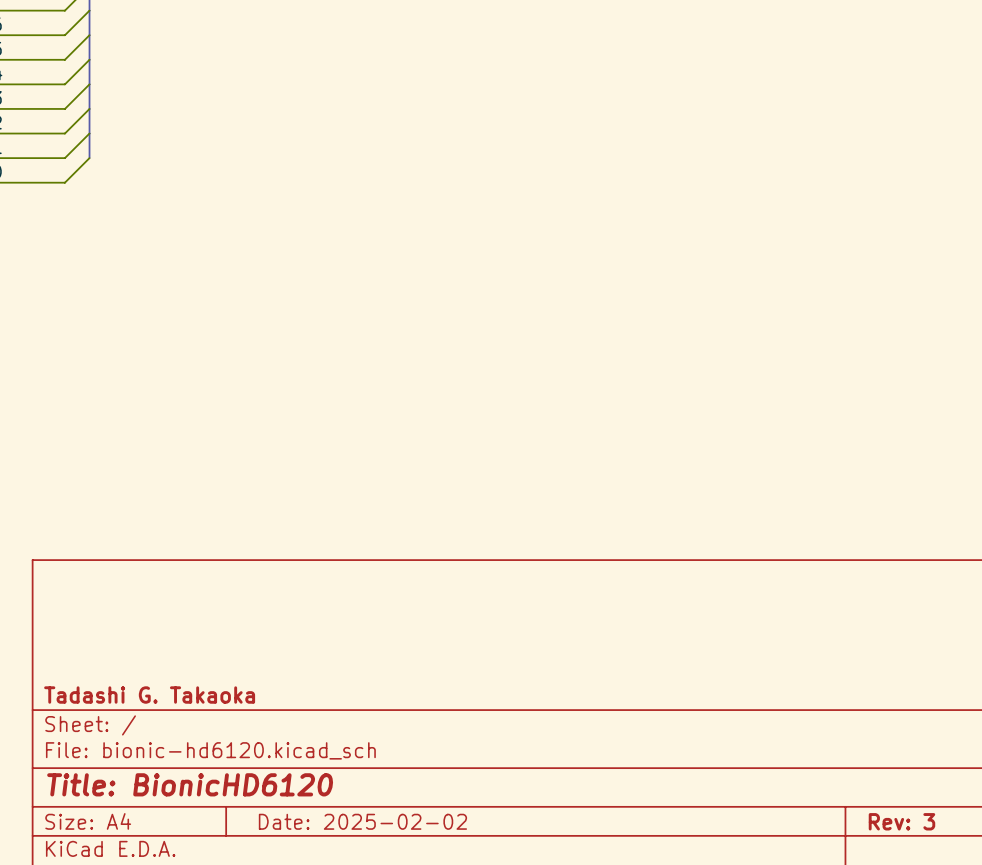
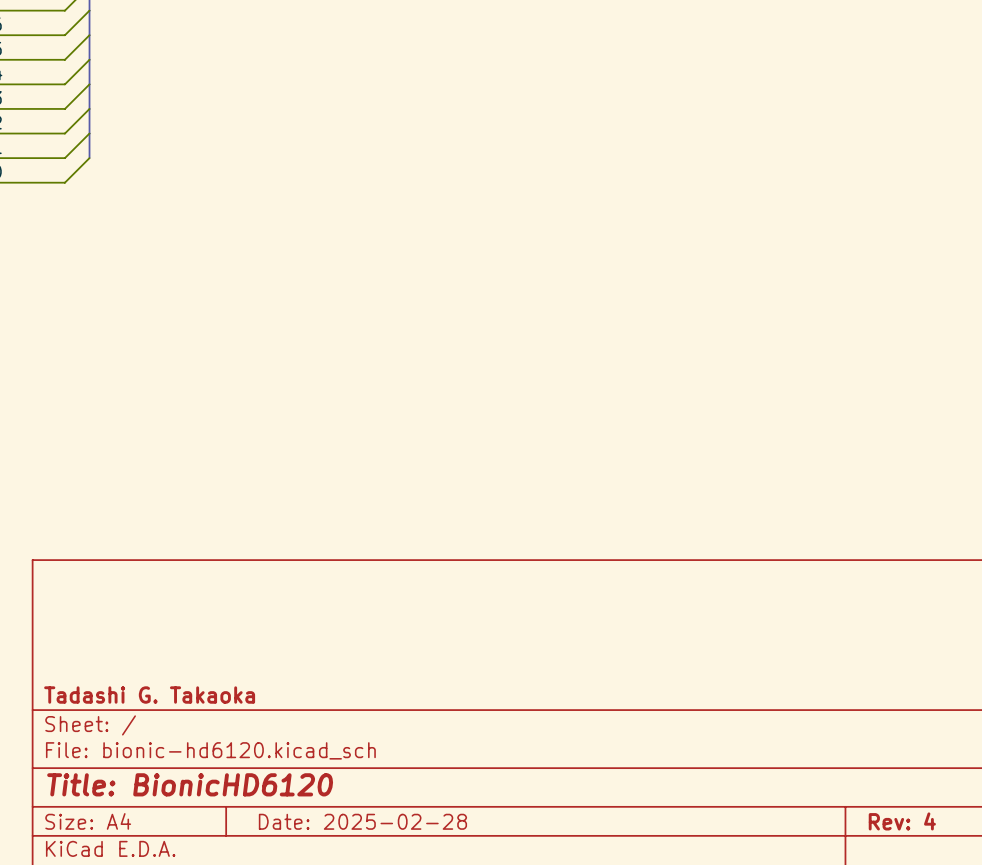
title block: Date: 2025-02-02 (362, 821) -> Date: 2025-02-28 (362, 821)
title block: Rev: 3 (901, 821) -> Rev: 4 (902, 821)

